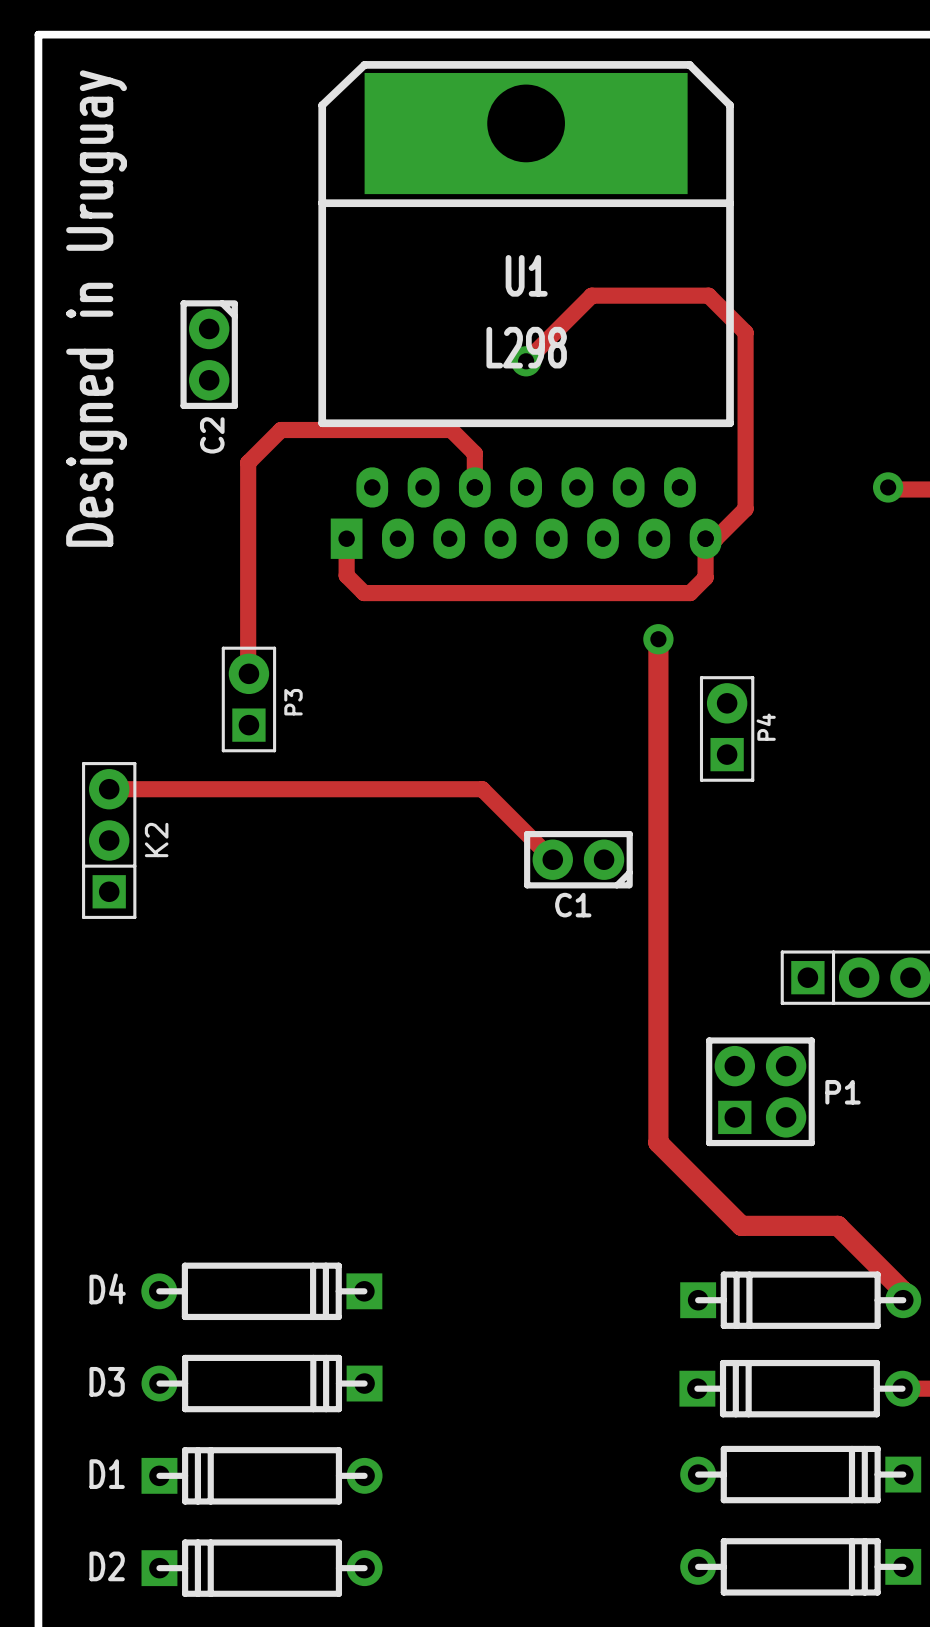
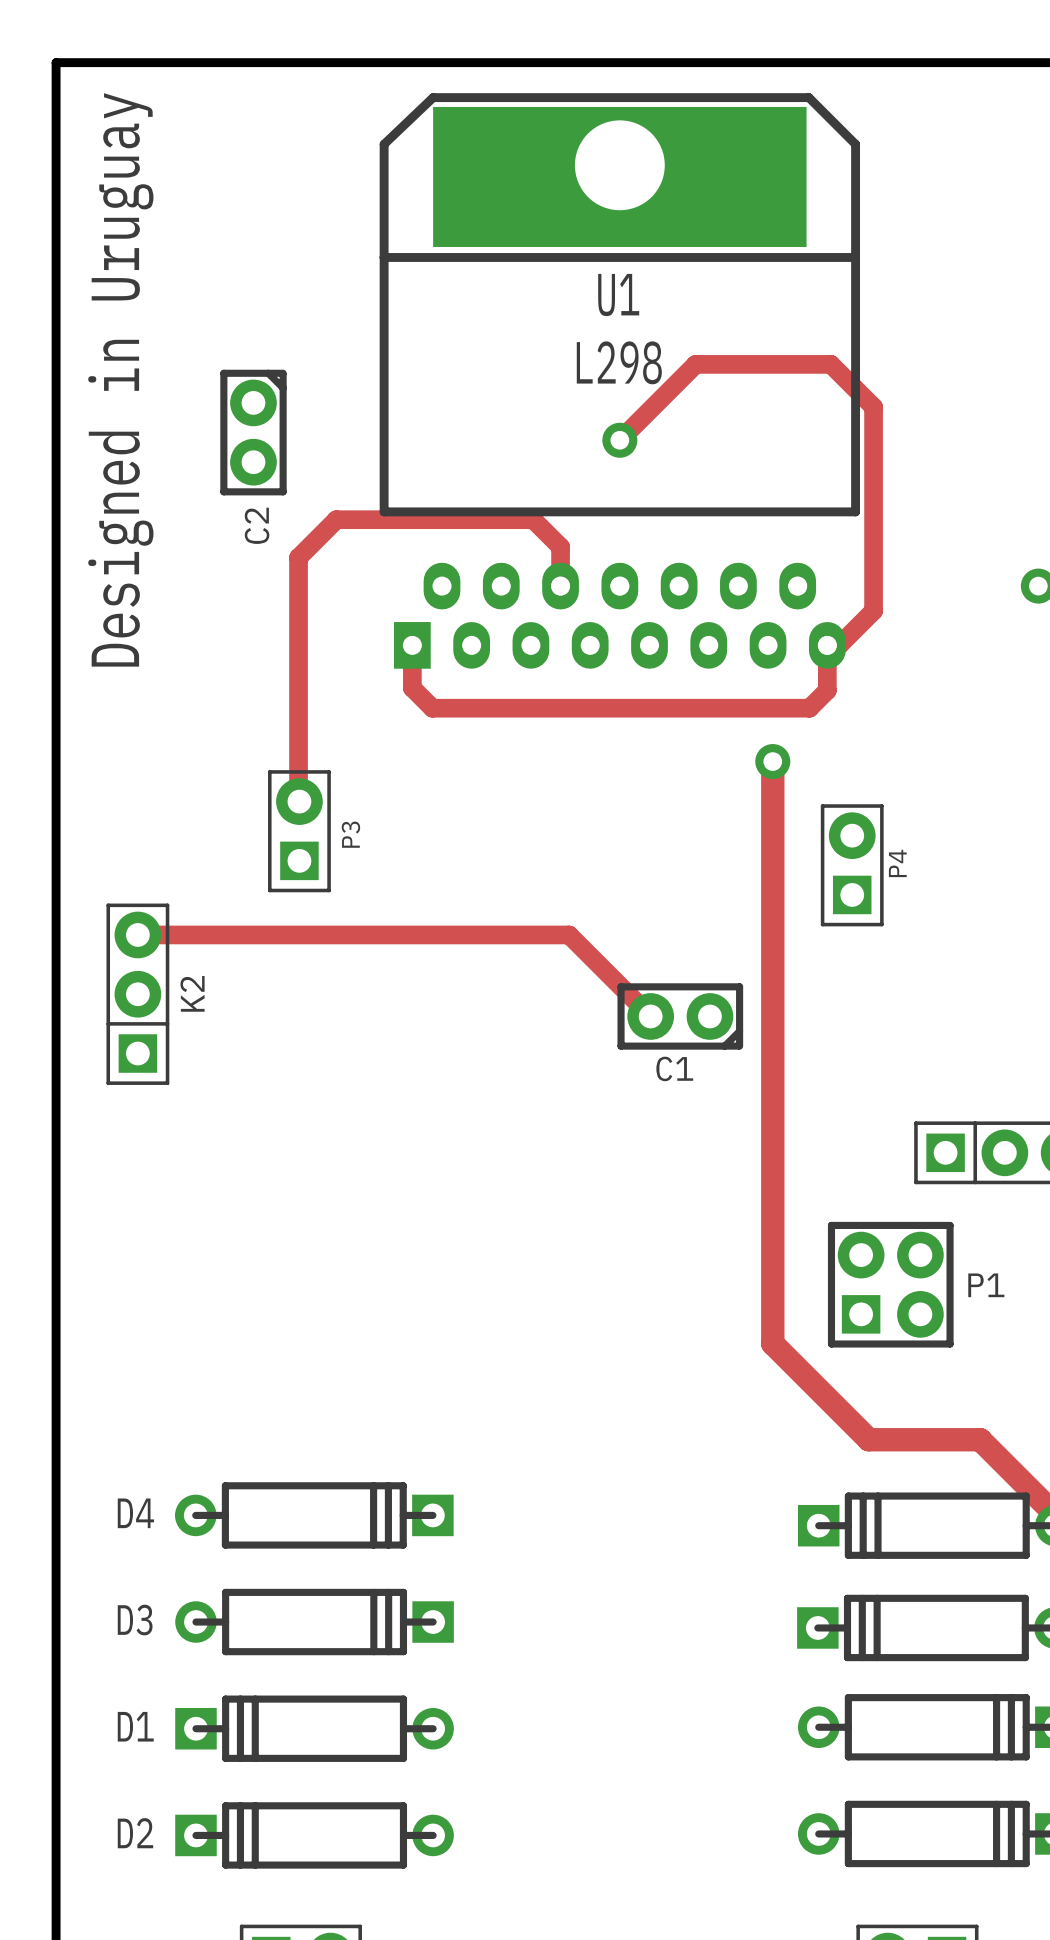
U1 name position: U1 (526, 275) -> U1 (618, 295)
U1 value position: L298 (526, 347) -> L298 (619, 362)

